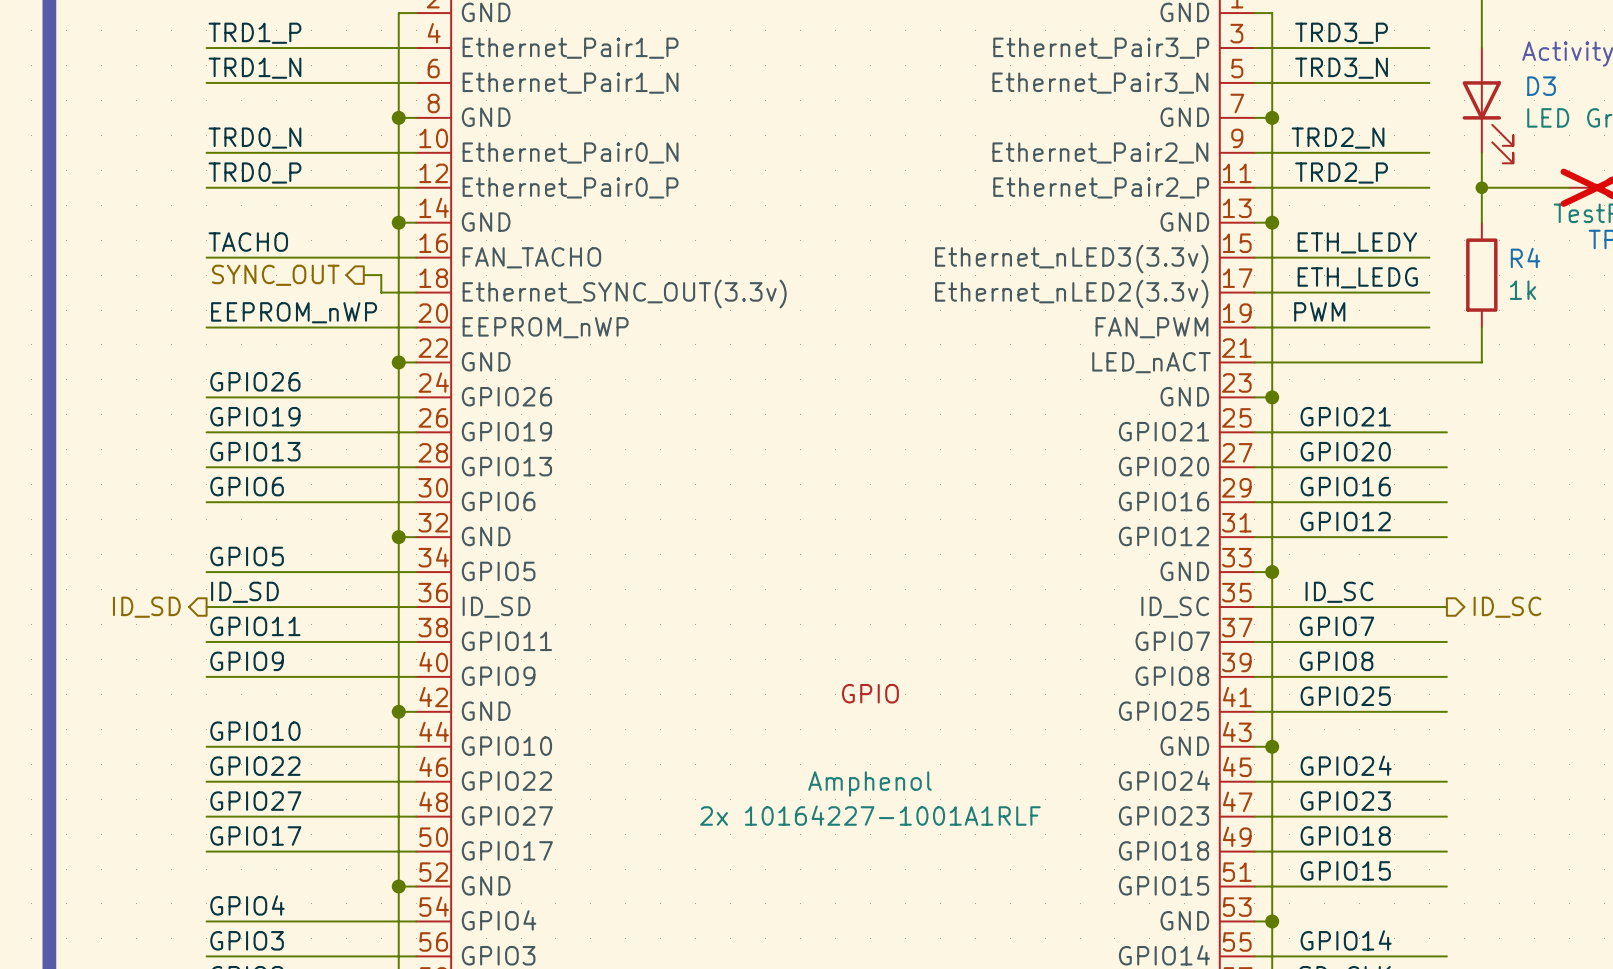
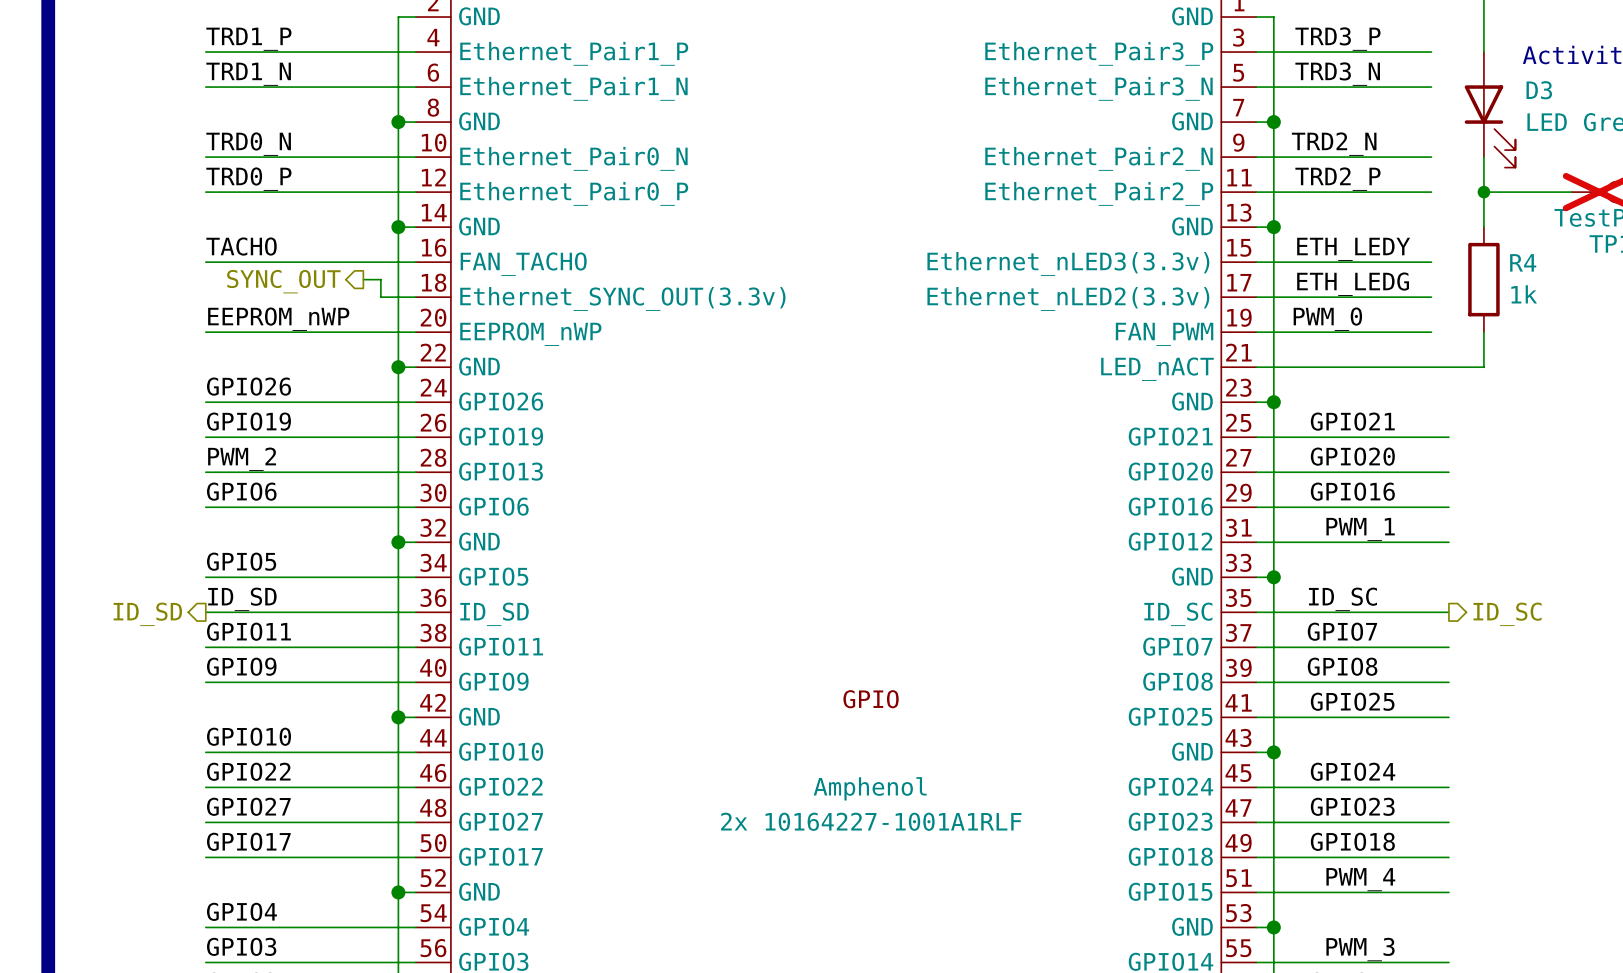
label: PWM (1319, 311) -> PWM_0 (1327, 319)
label: GPIO13 (255, 451) -> PWM_2 (242, 459)
label: GPIO12 (1345, 521) -> PWM_1 (1360, 529)
label: GPIO15 (1345, 870) -> PWM_4 (1360, 879)
label: GPIO14 (1346, 940) -> PWM_3 (1360, 949)

